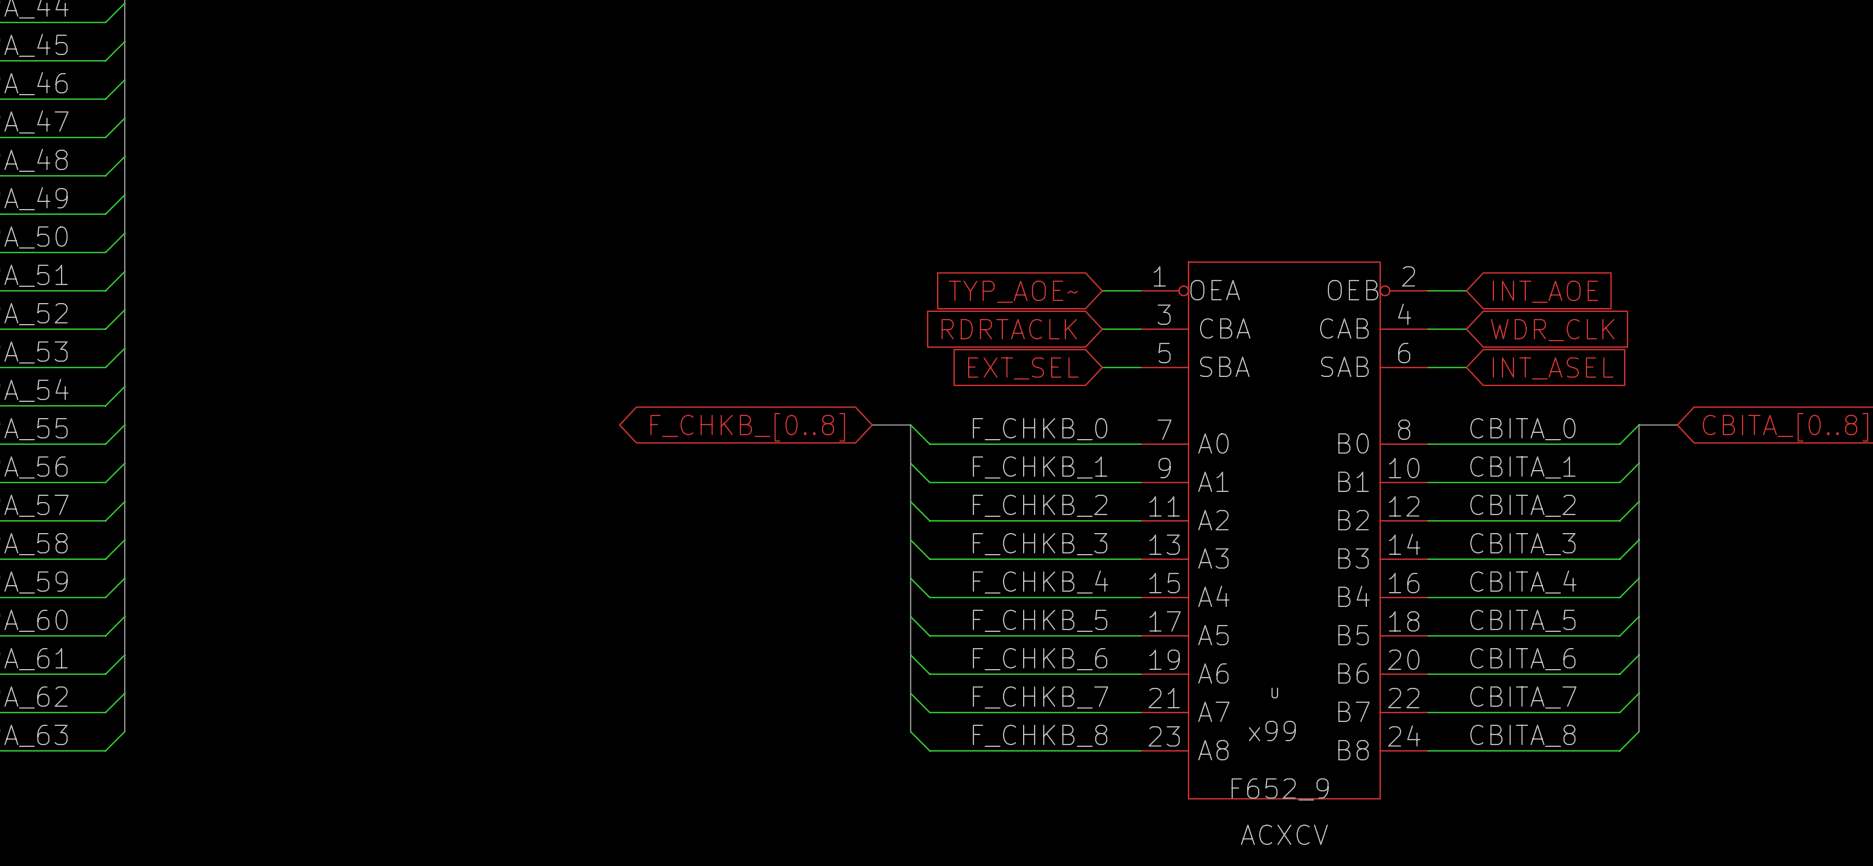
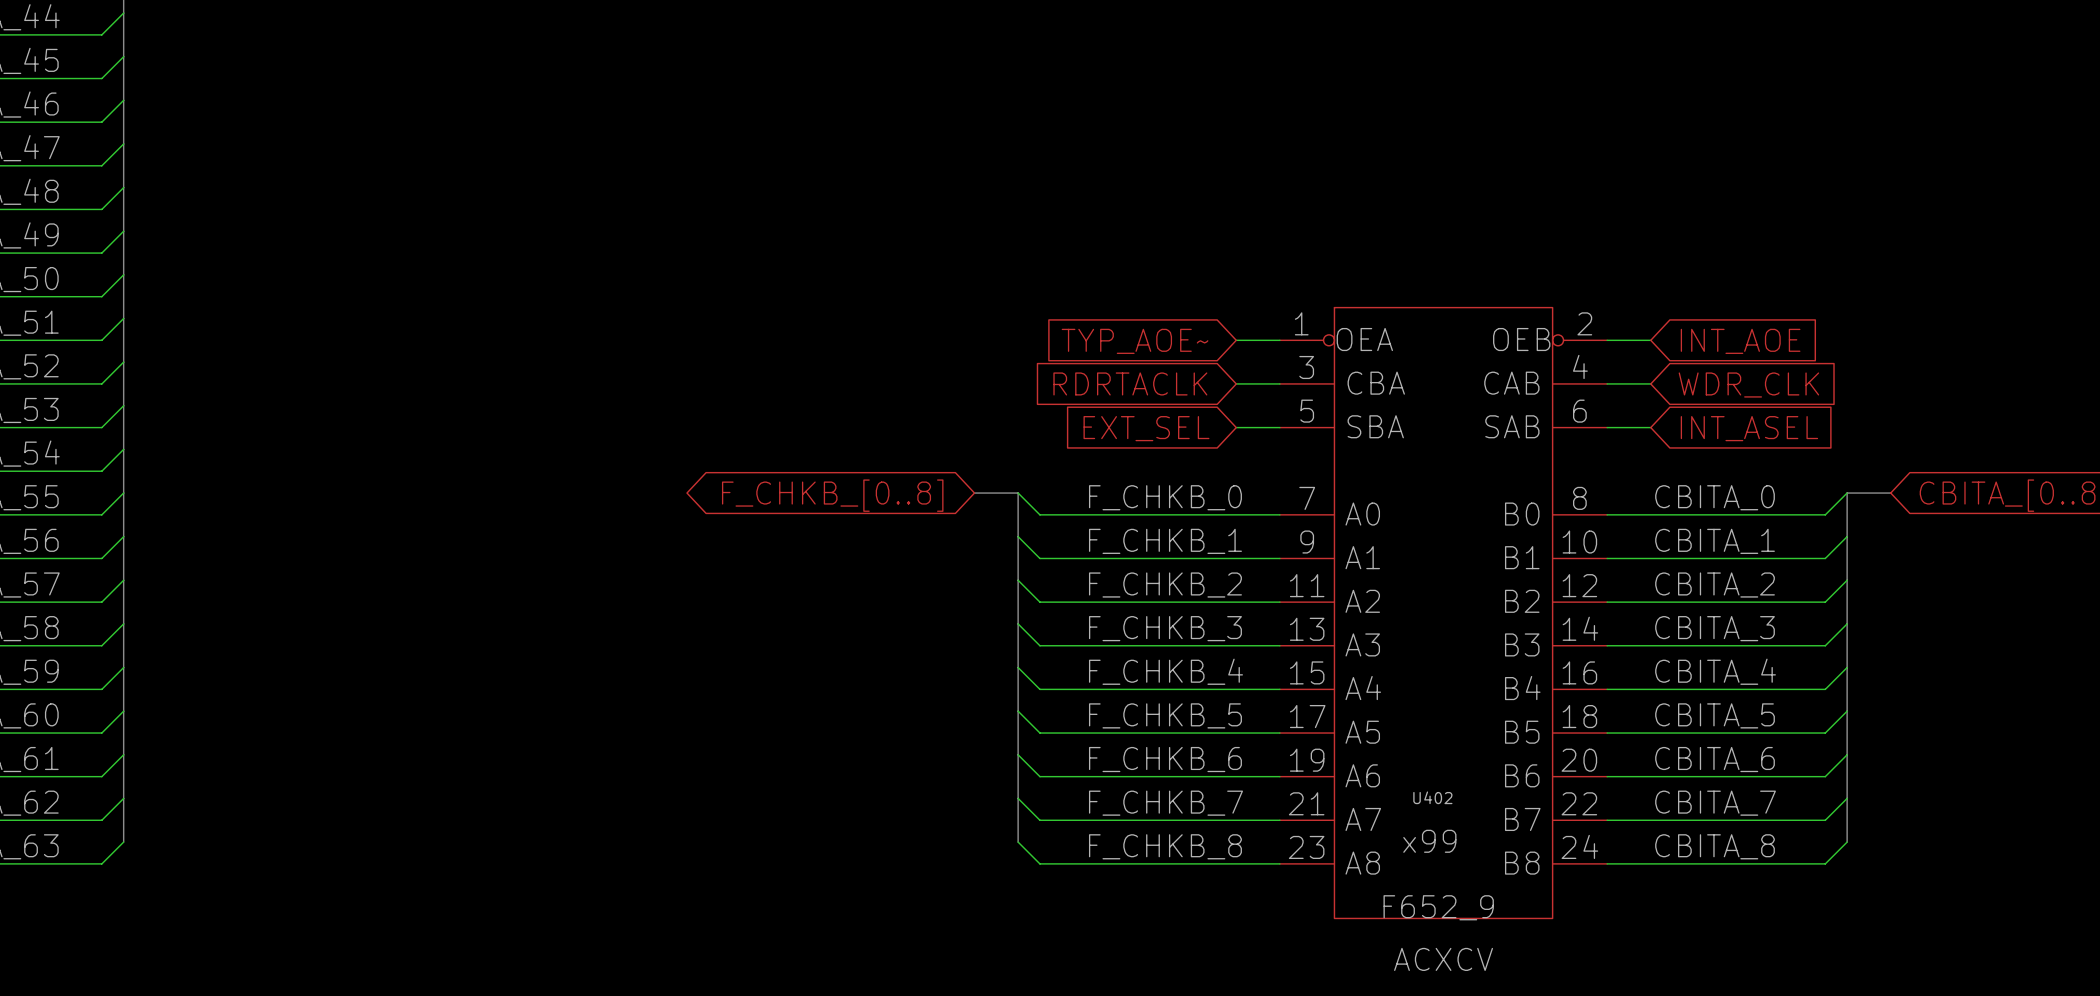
U name: U (1274, 693) -> U402 (1432, 797)

